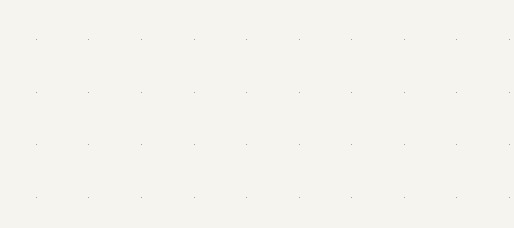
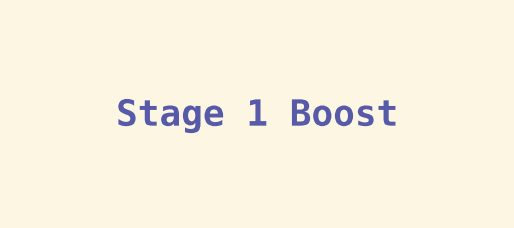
text: none -> Stage 1 Boost (256, 116)

